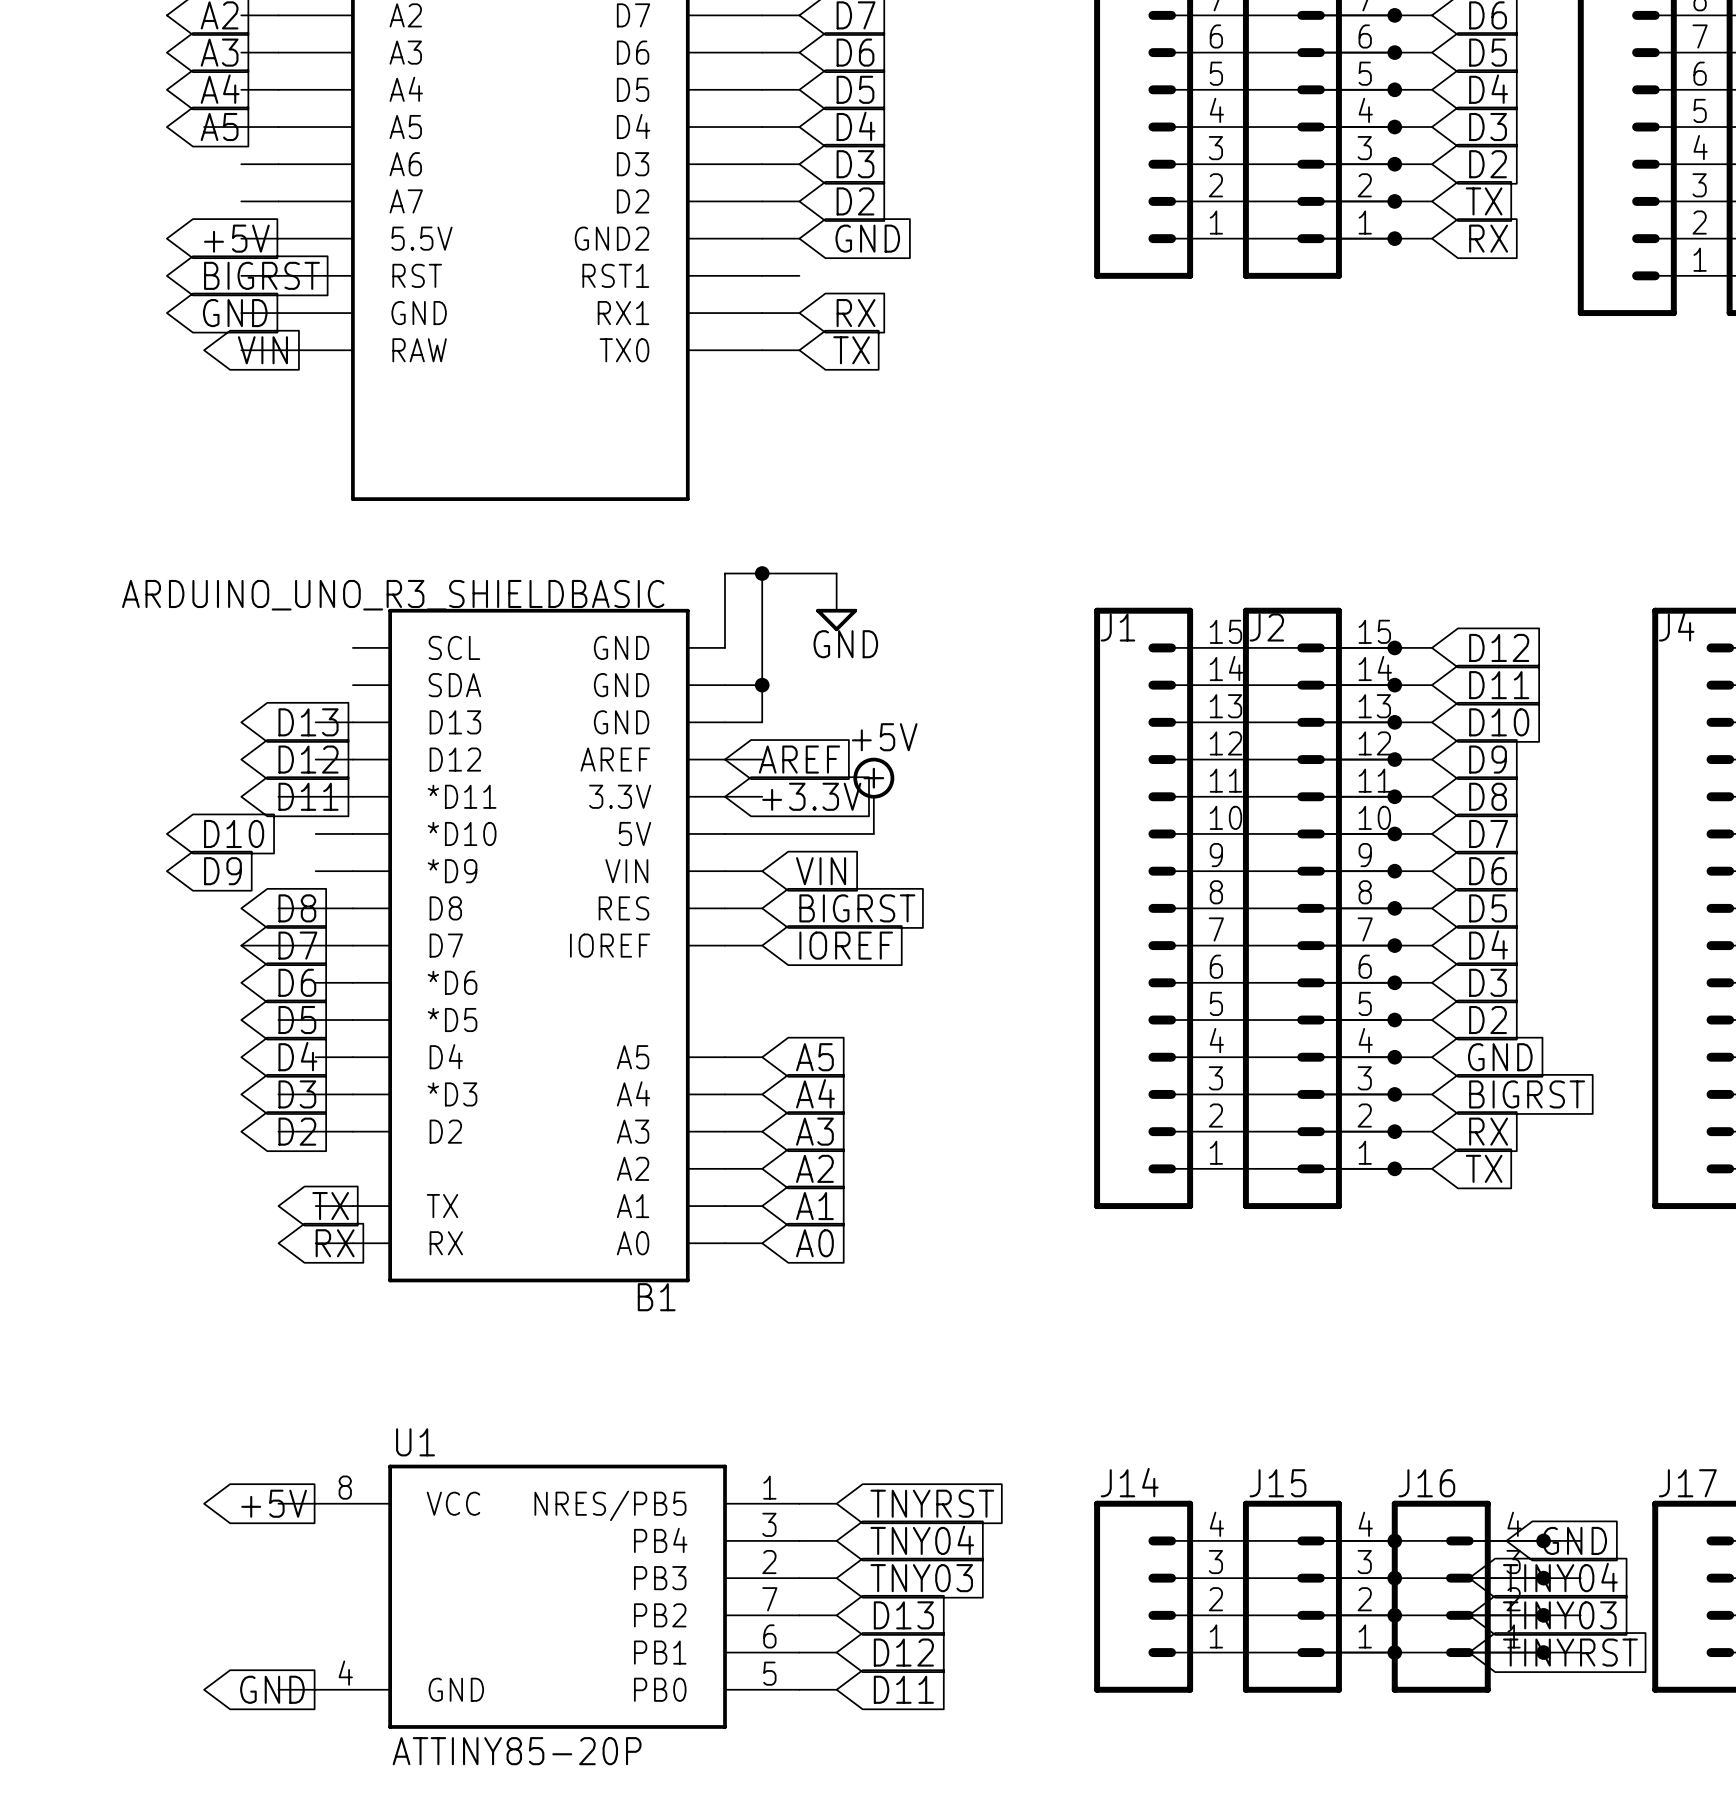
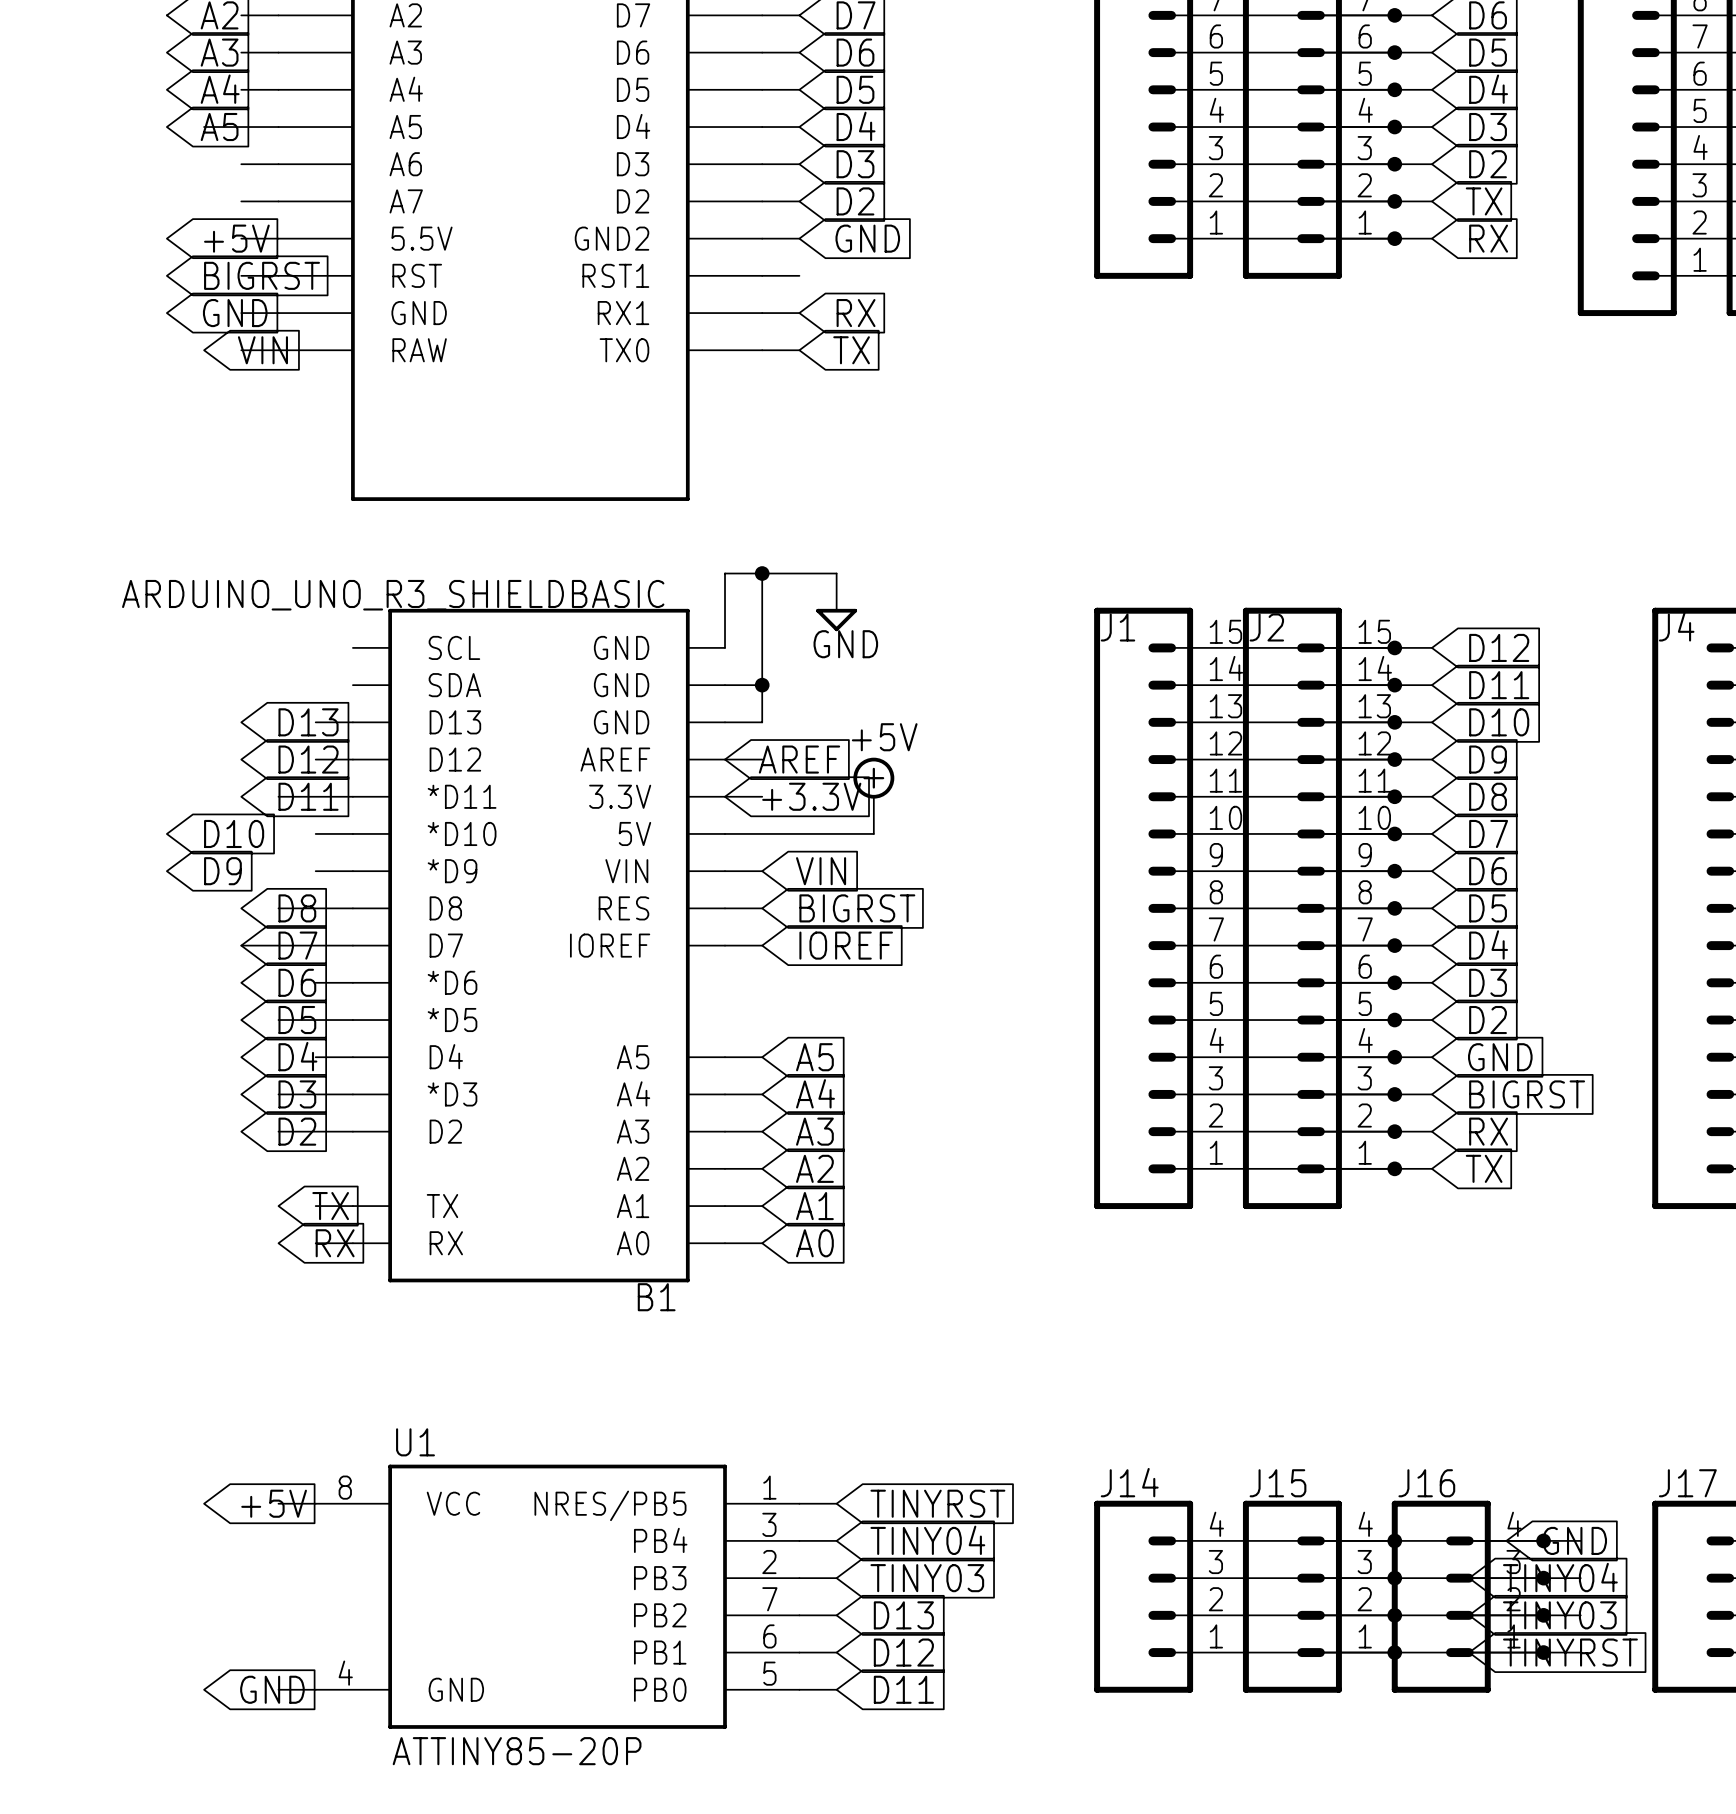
global label: TNYRST (932, 1503) -> TINYRST (937, 1503)
global label: TNY04 (922, 1540) -> TINY04 (927, 1540)
global label: TNY03 (921, 1578) -> TINY03 (927, 1578)

